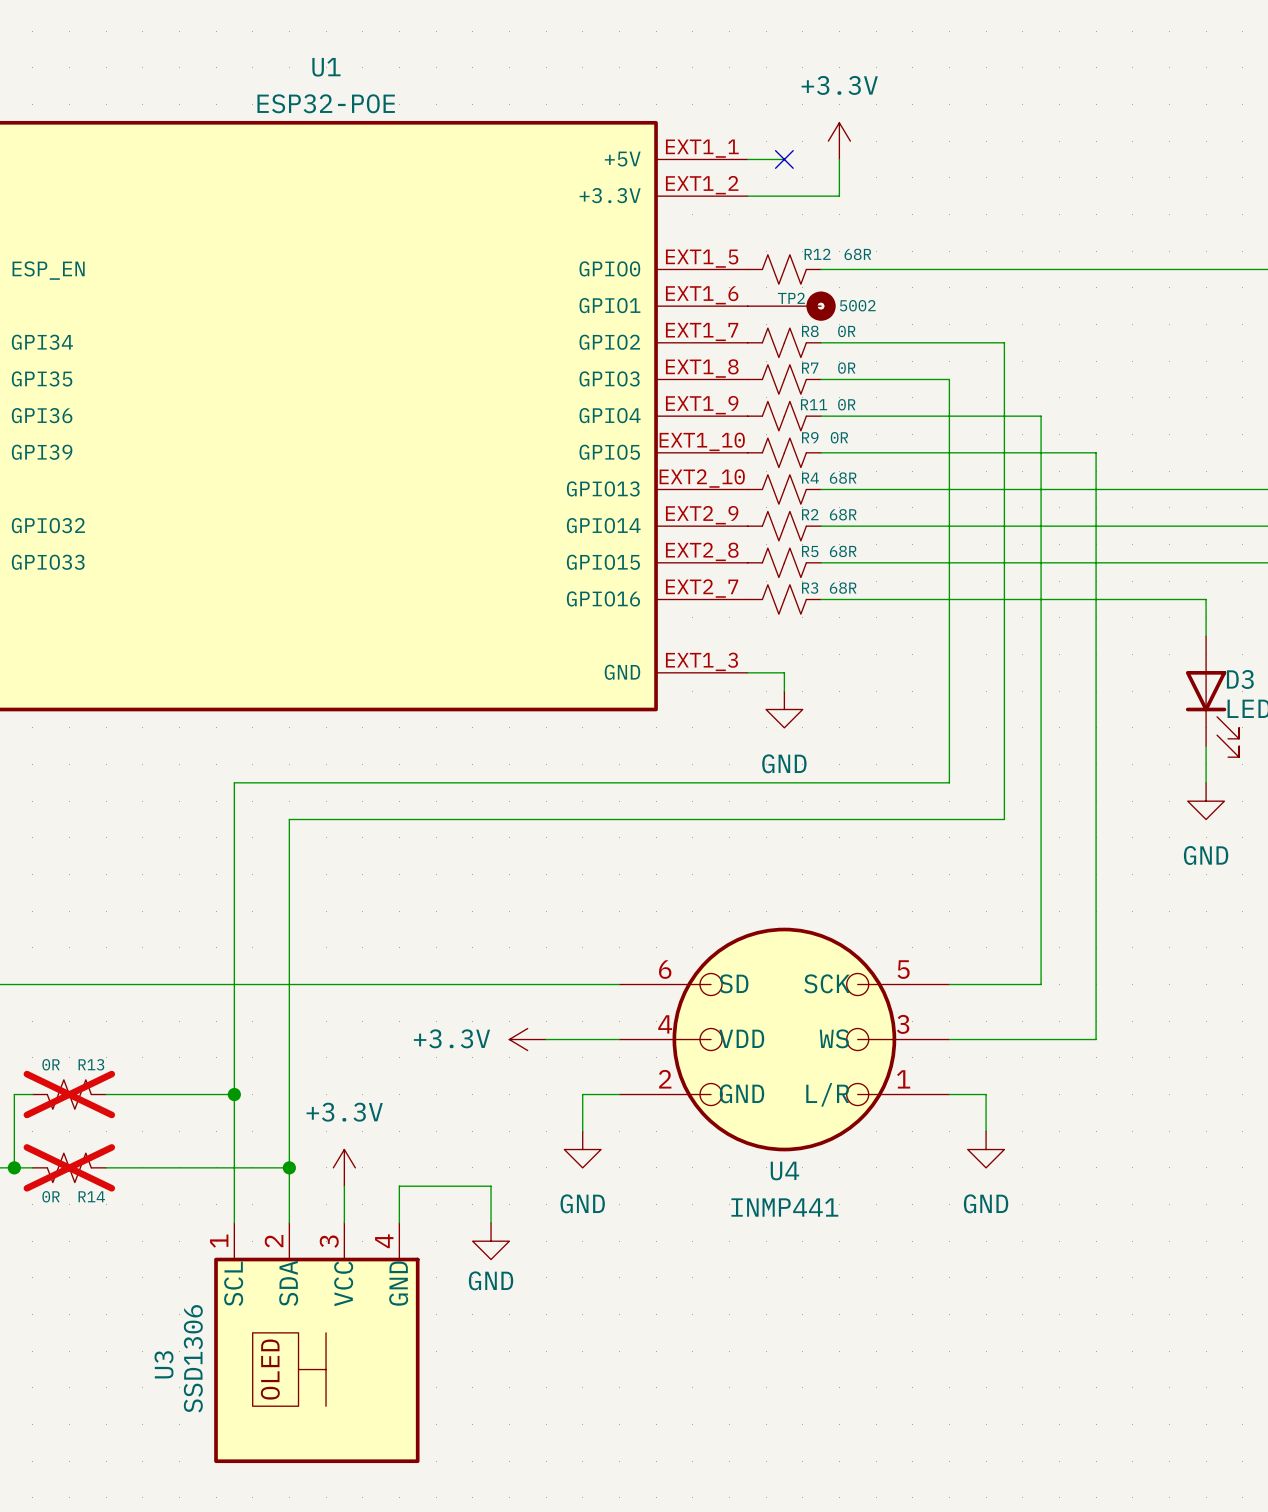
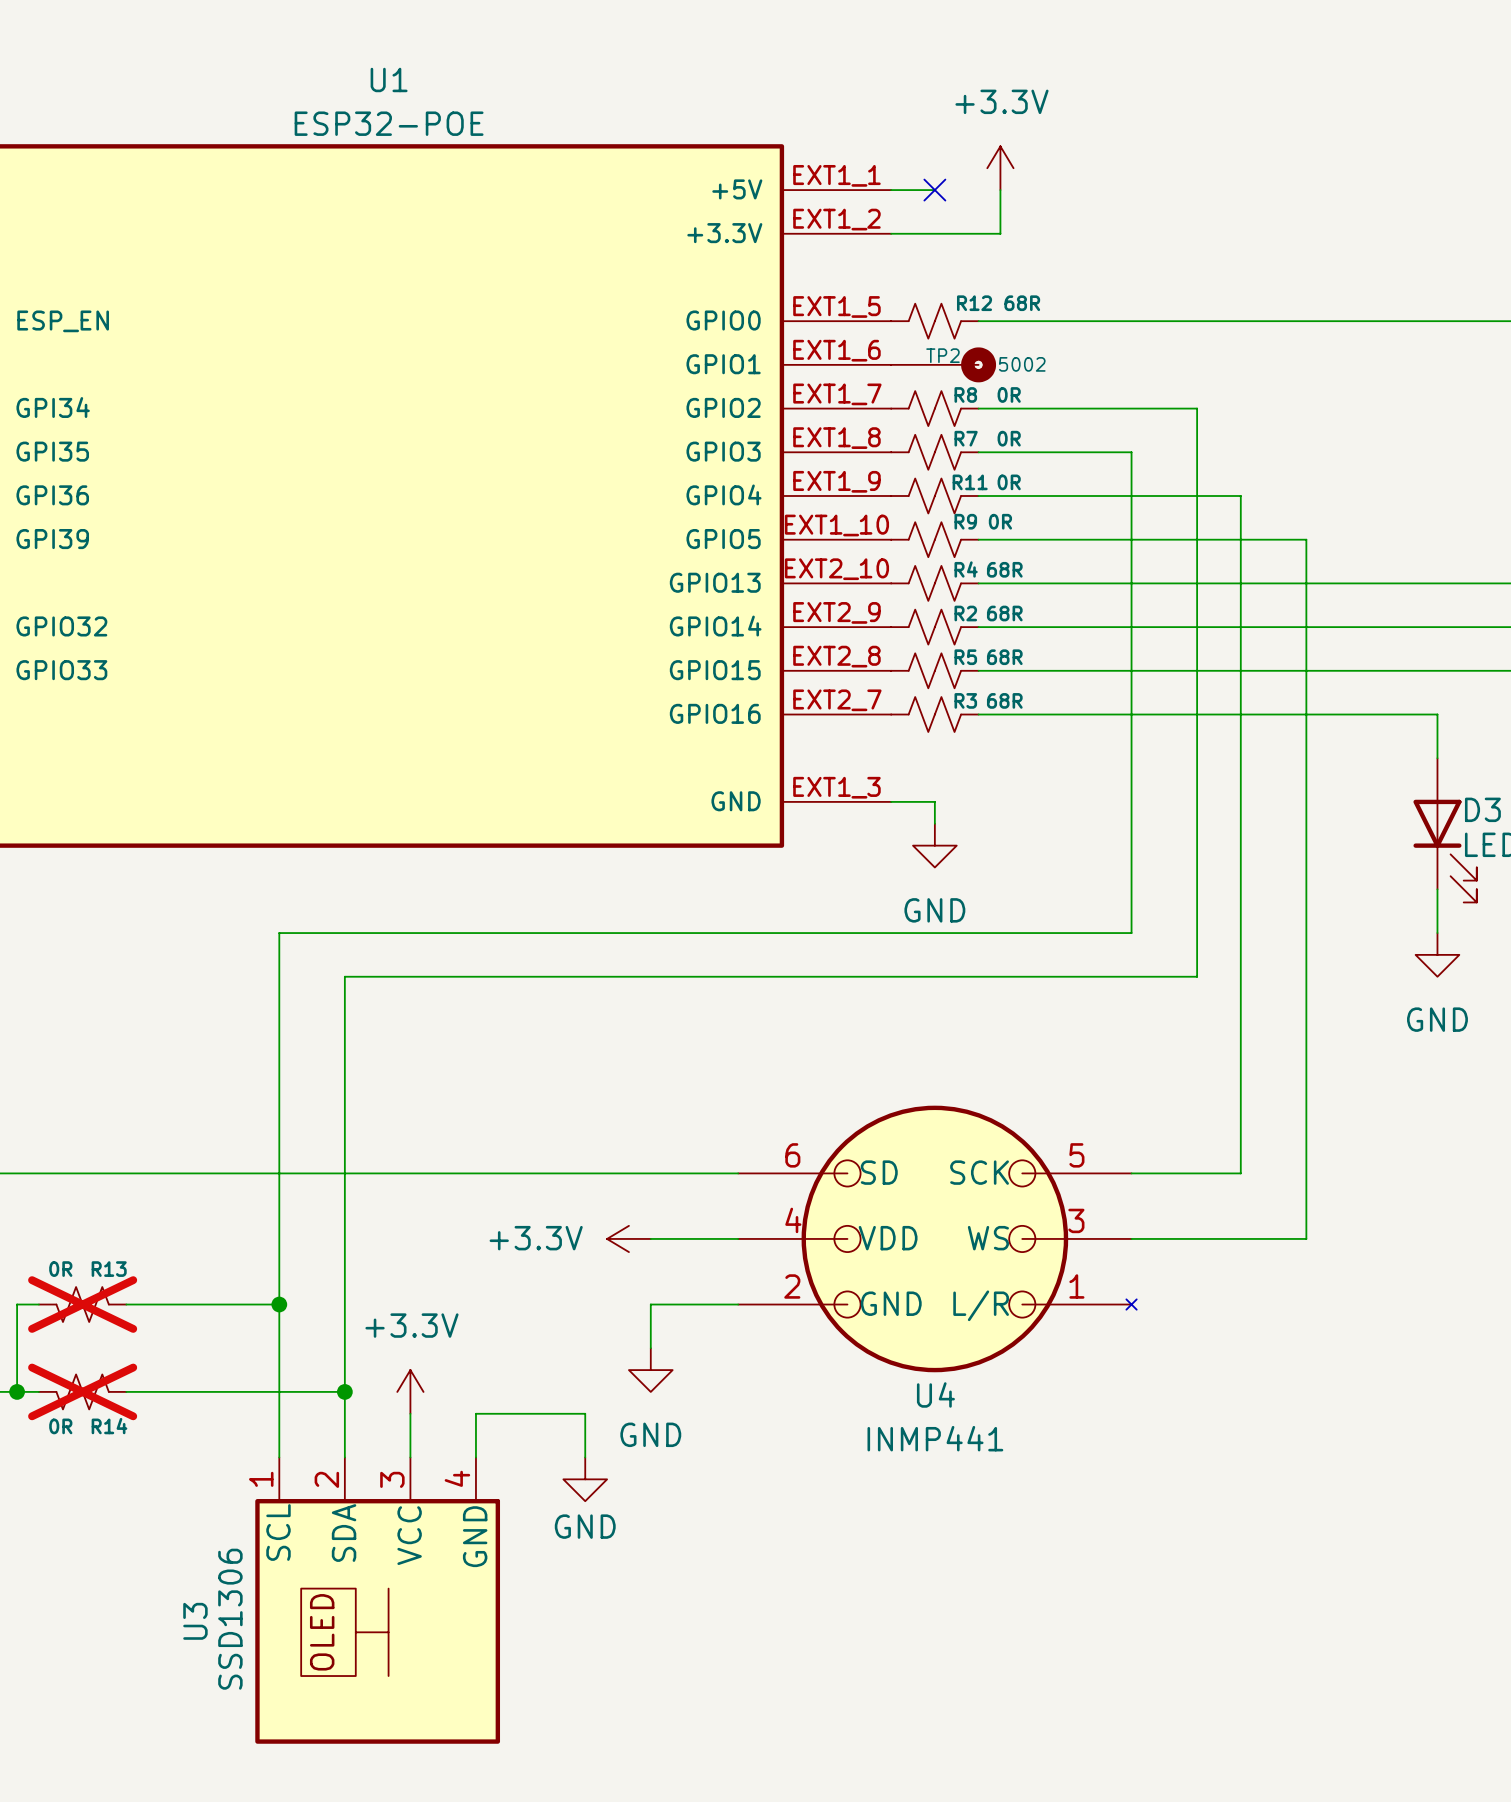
U4 symbol: [619, 927, 950, 1152] -> [738, 1105, 1137, 1373]
wire: (582, 1094) (582, 1131) -> (694, 1304) (650, 1304) (650, 1348)
wire: (949, 1094) (986, 1094) (986, 1131) -> none
power symbol position: GND (582, 1149) -> GND (650, 1370)
power symbol: GND (986, 1149) -> none

